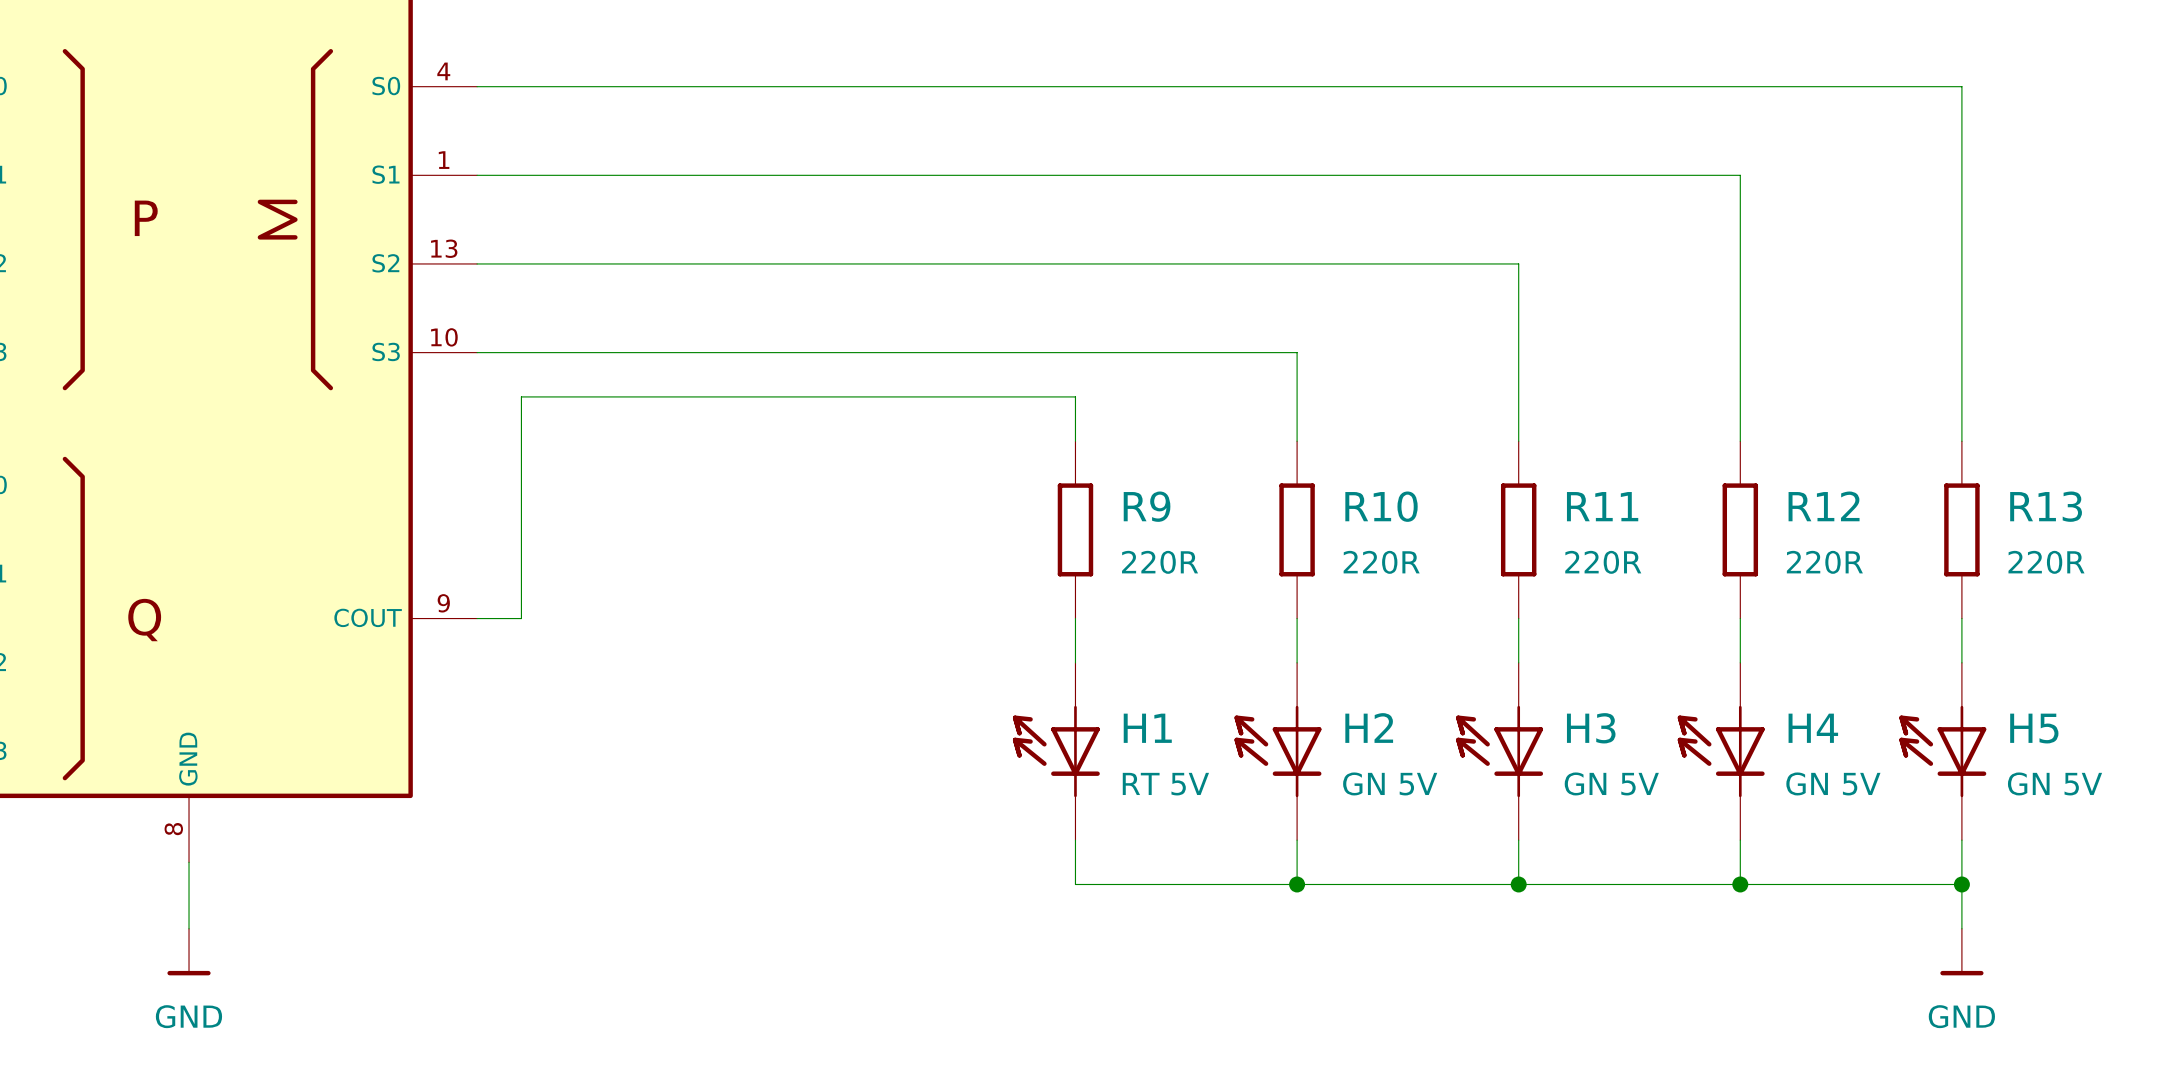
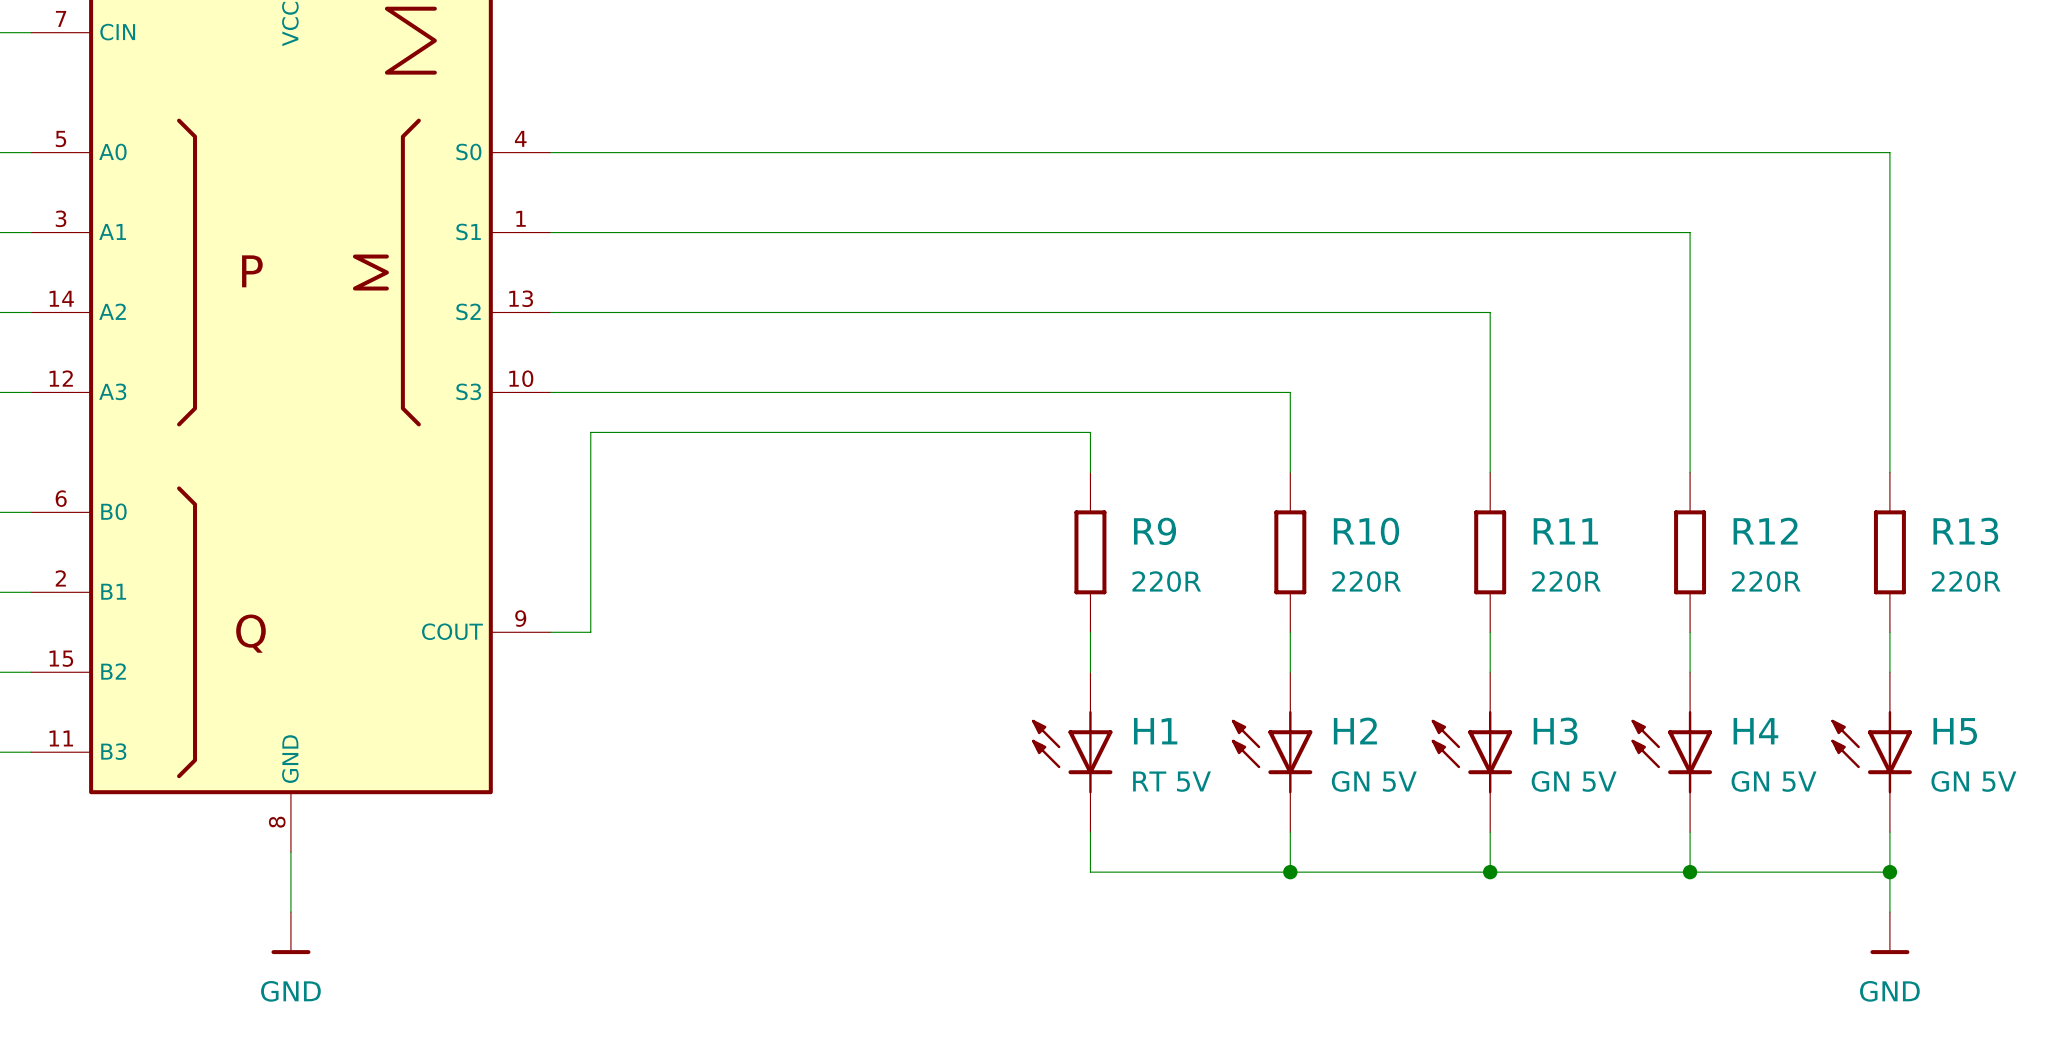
H1 symbol: [1012, 662, 1100, 841] -> [1032, 672, 1113, 833]
H2 symbol: [1234, 662, 1322, 841] -> [1231, 672, 1313, 833]
H3 symbol: [1456, 662, 1544, 841] -> [1431, 672, 1513, 833]
H4 symbol: [1677, 662, 1765, 841] -> [1631, 672, 1713, 833]
H5 symbol: [1899, 662, 1987, 841] -> [1831, 672, 1912, 833]

